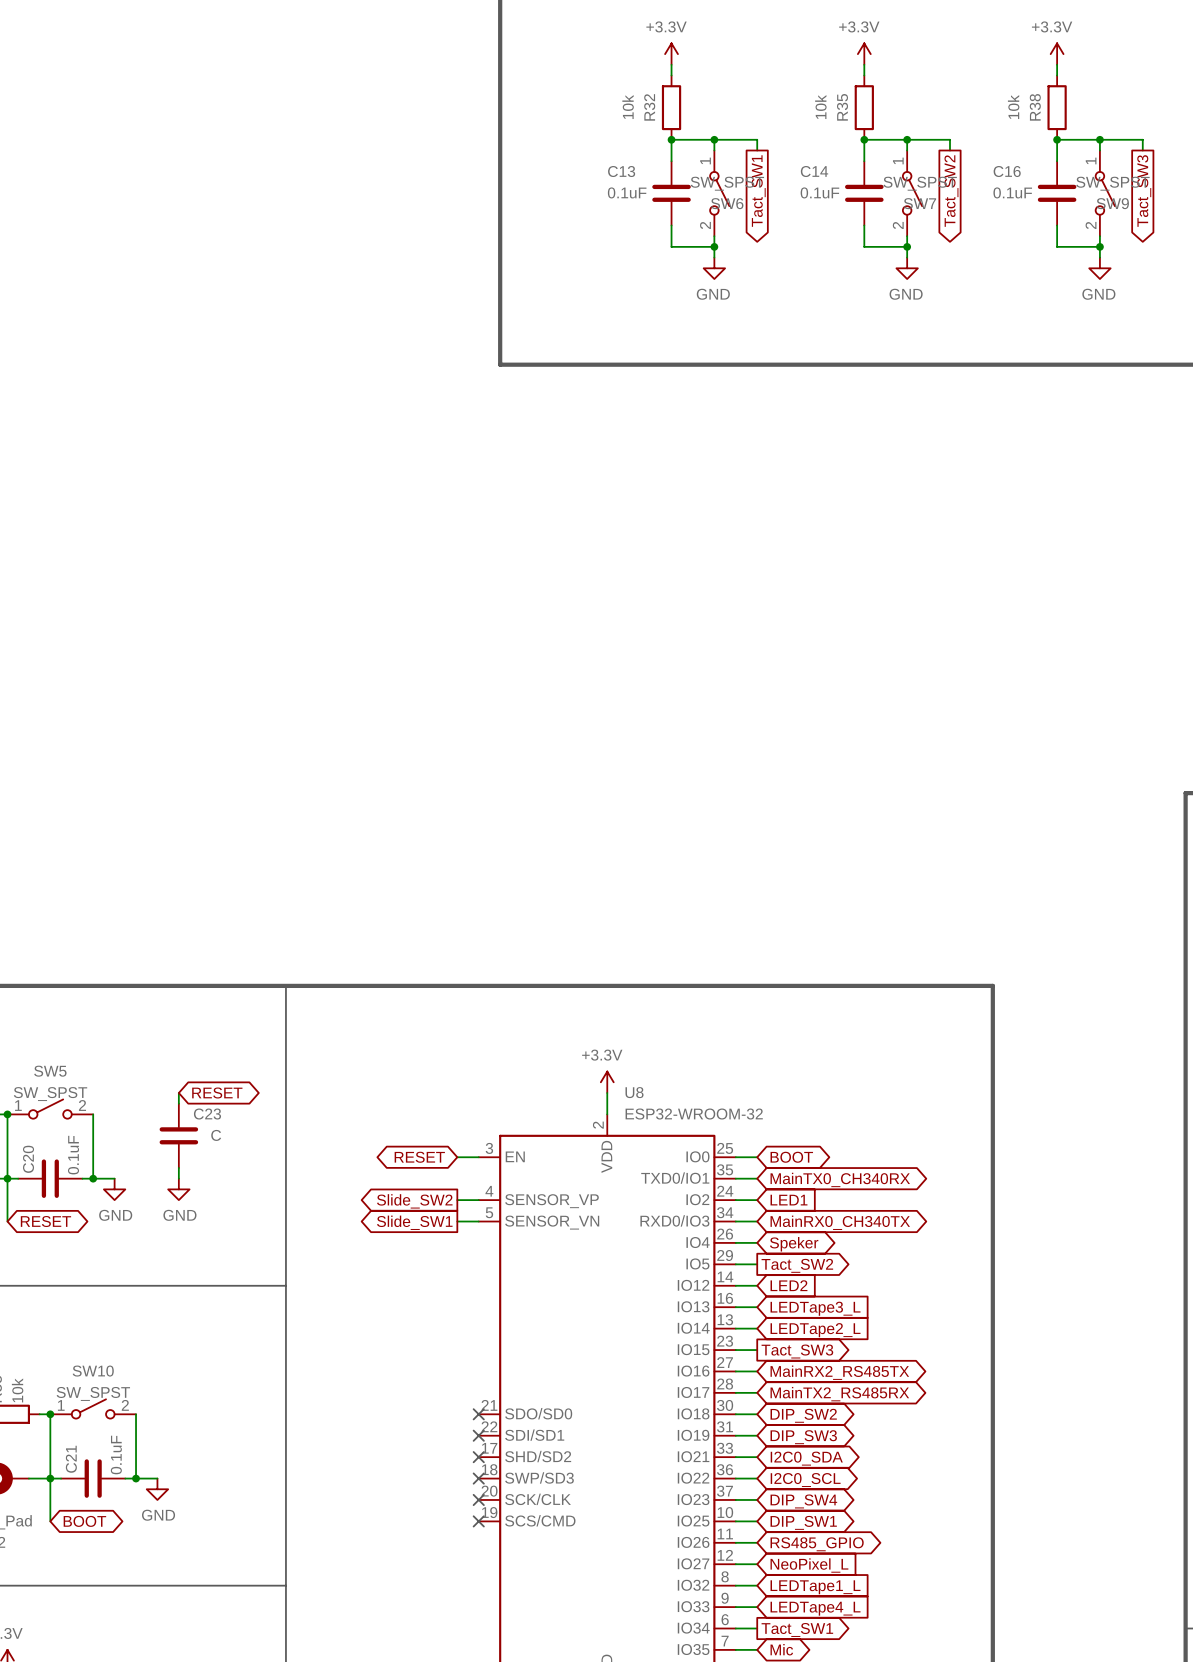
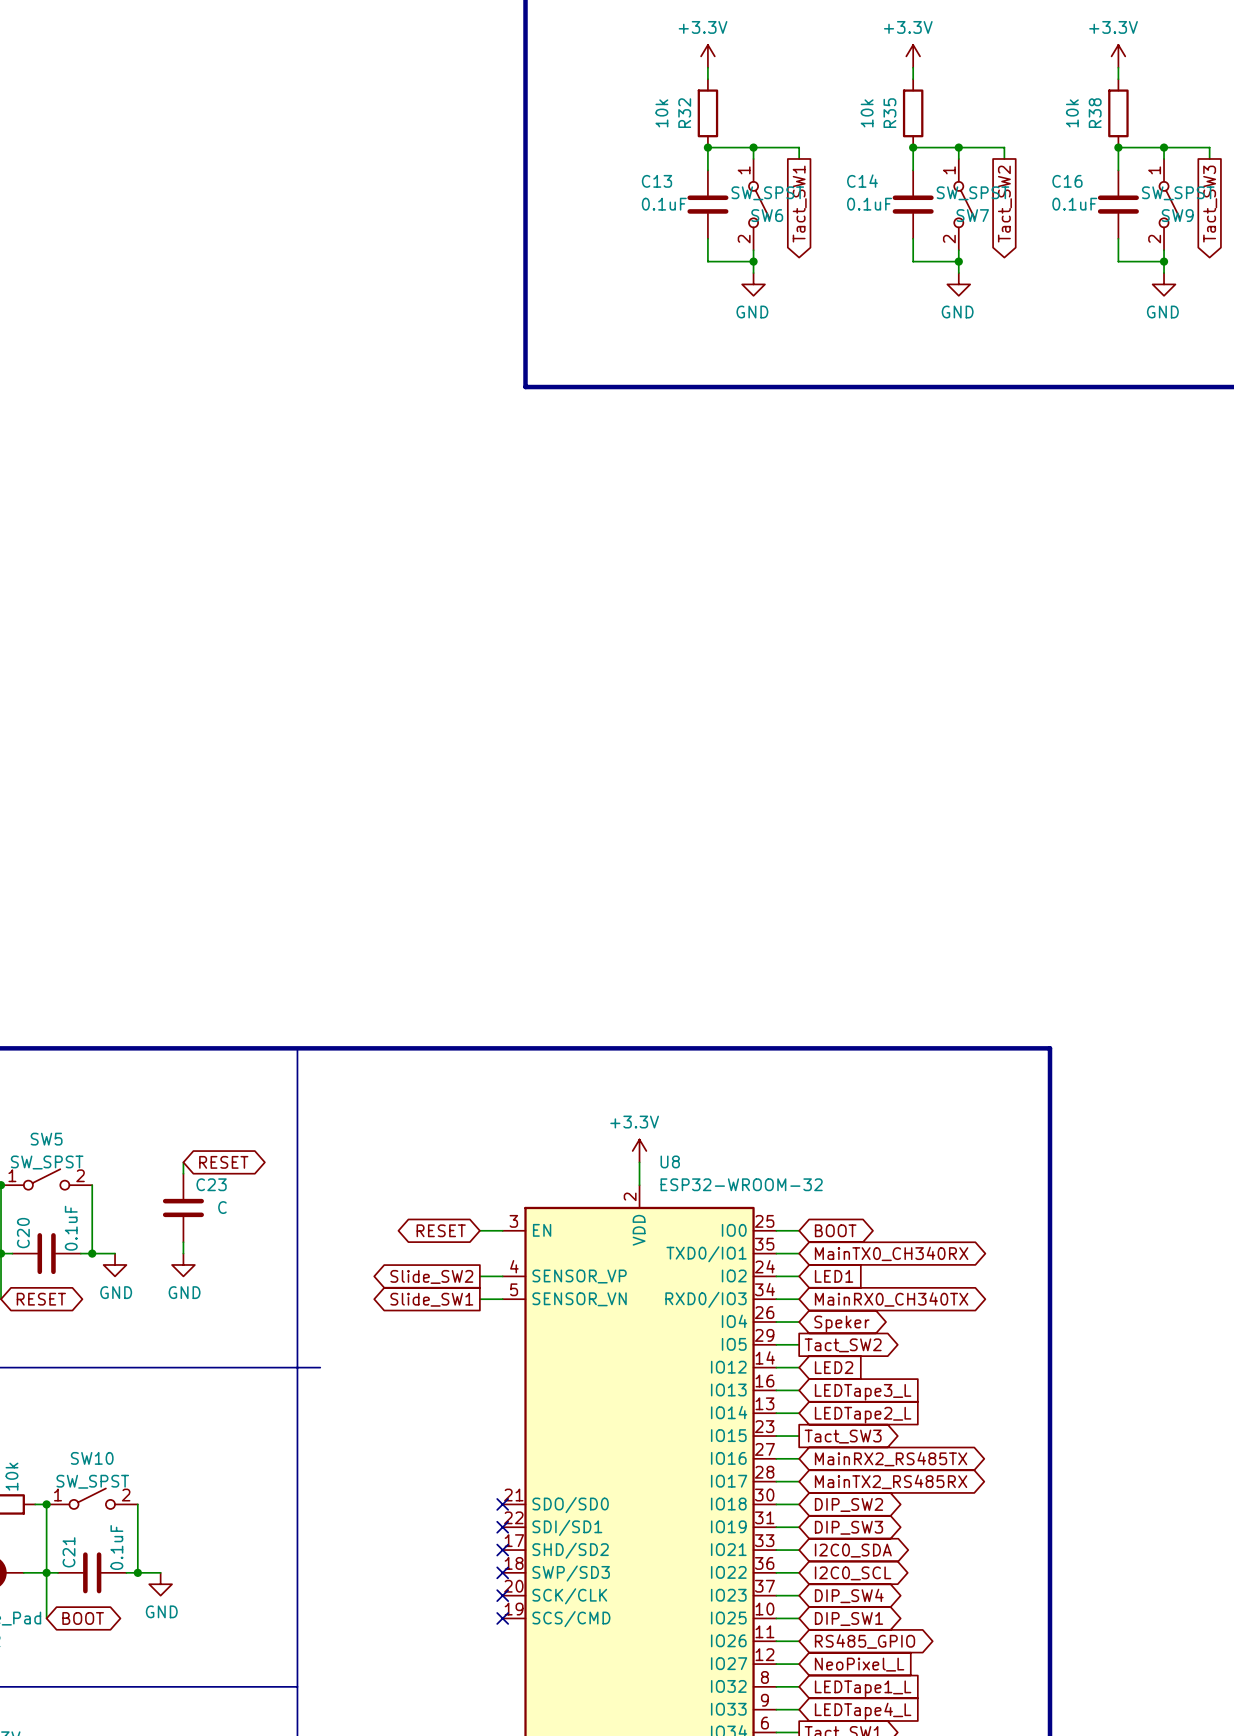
line: none -> (297, 1367) (320, 1367)

